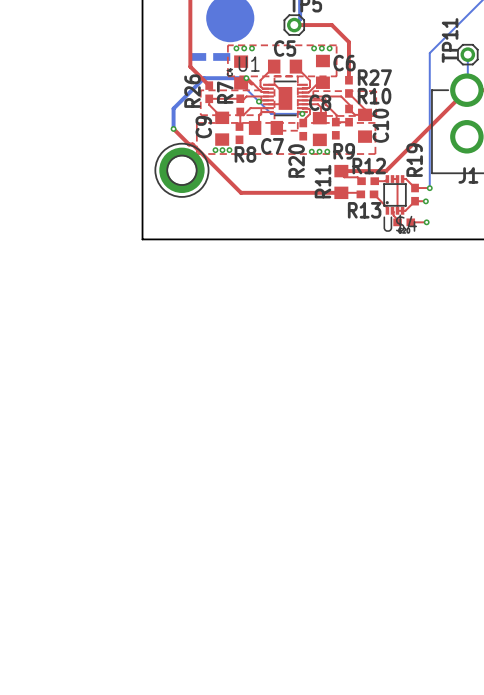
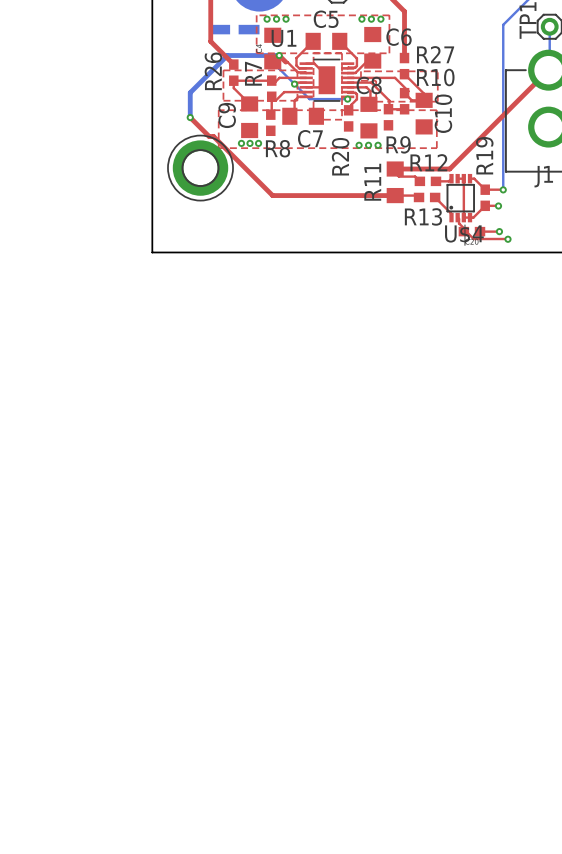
top track: none -> (463, 231) (473, 239) (507, 239)
via: none -> (507, 239)

